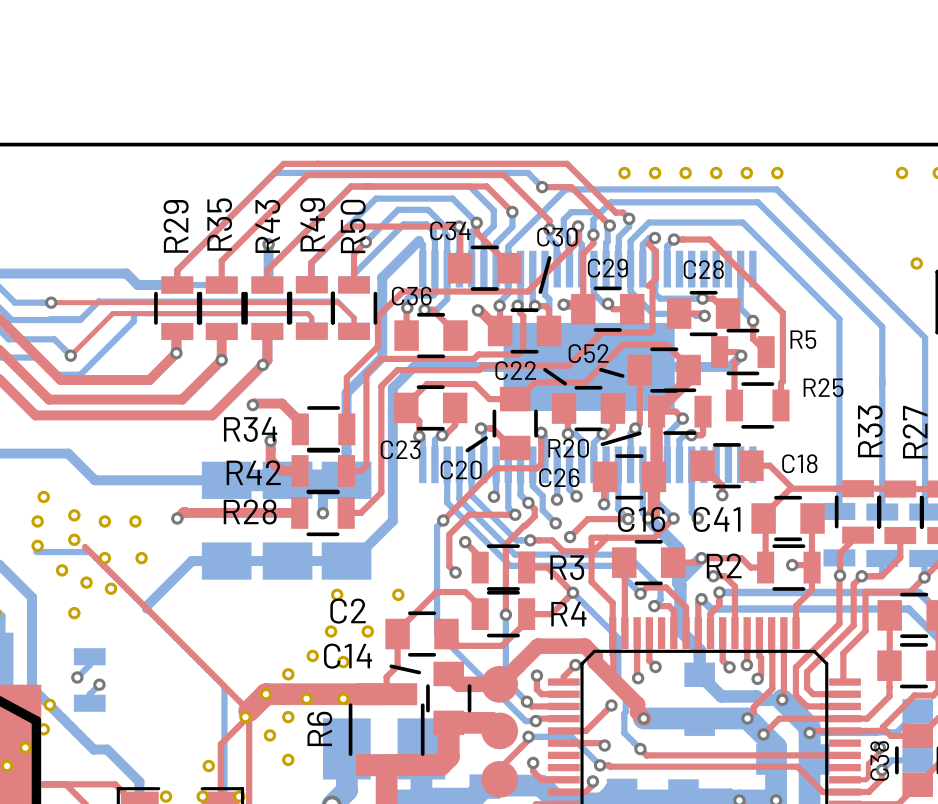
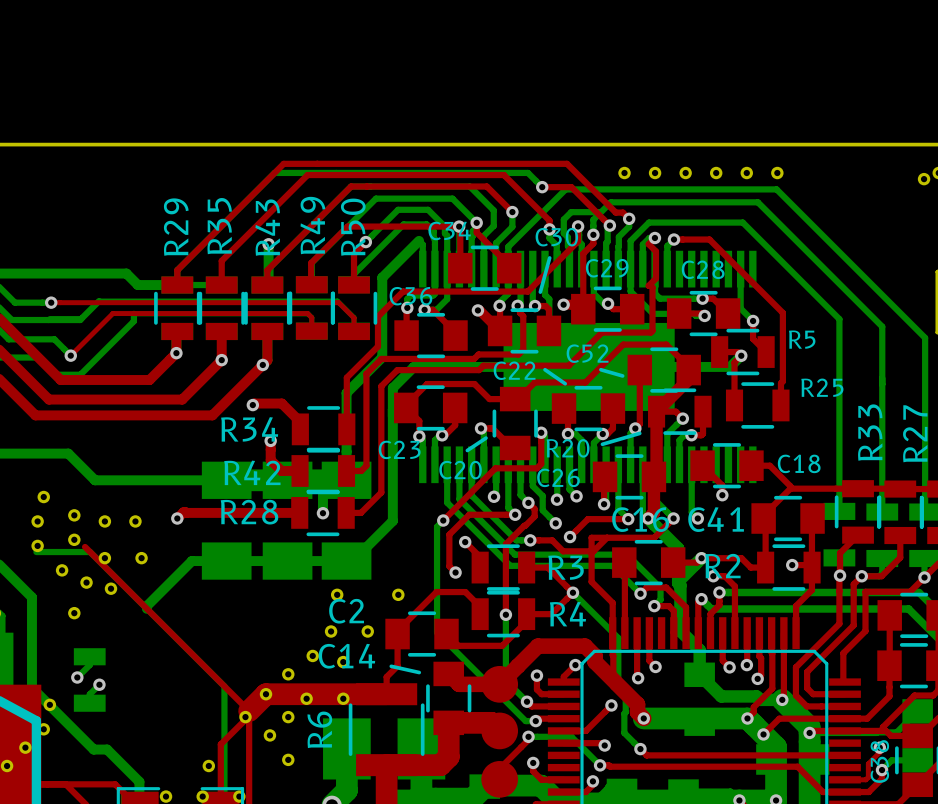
part position: (902, 173) -> (924, 179)
part: (916, 263) -> none

